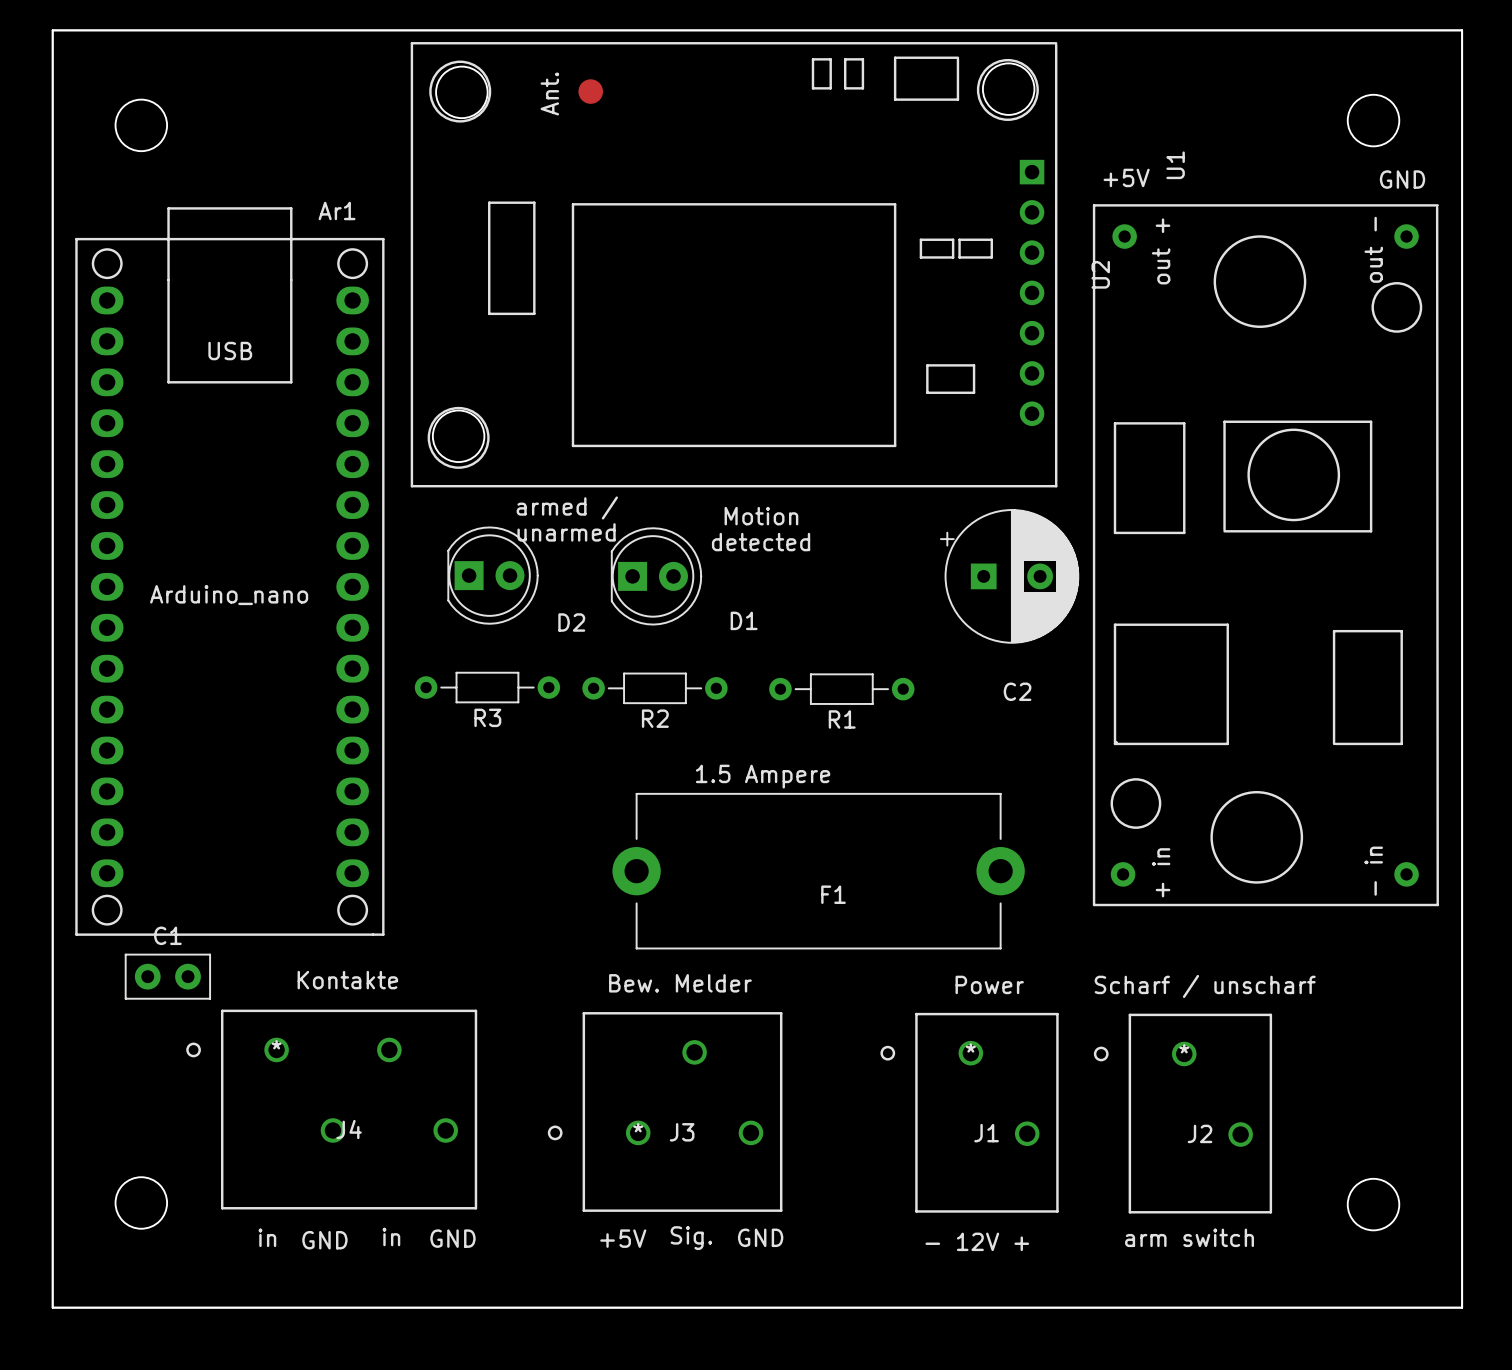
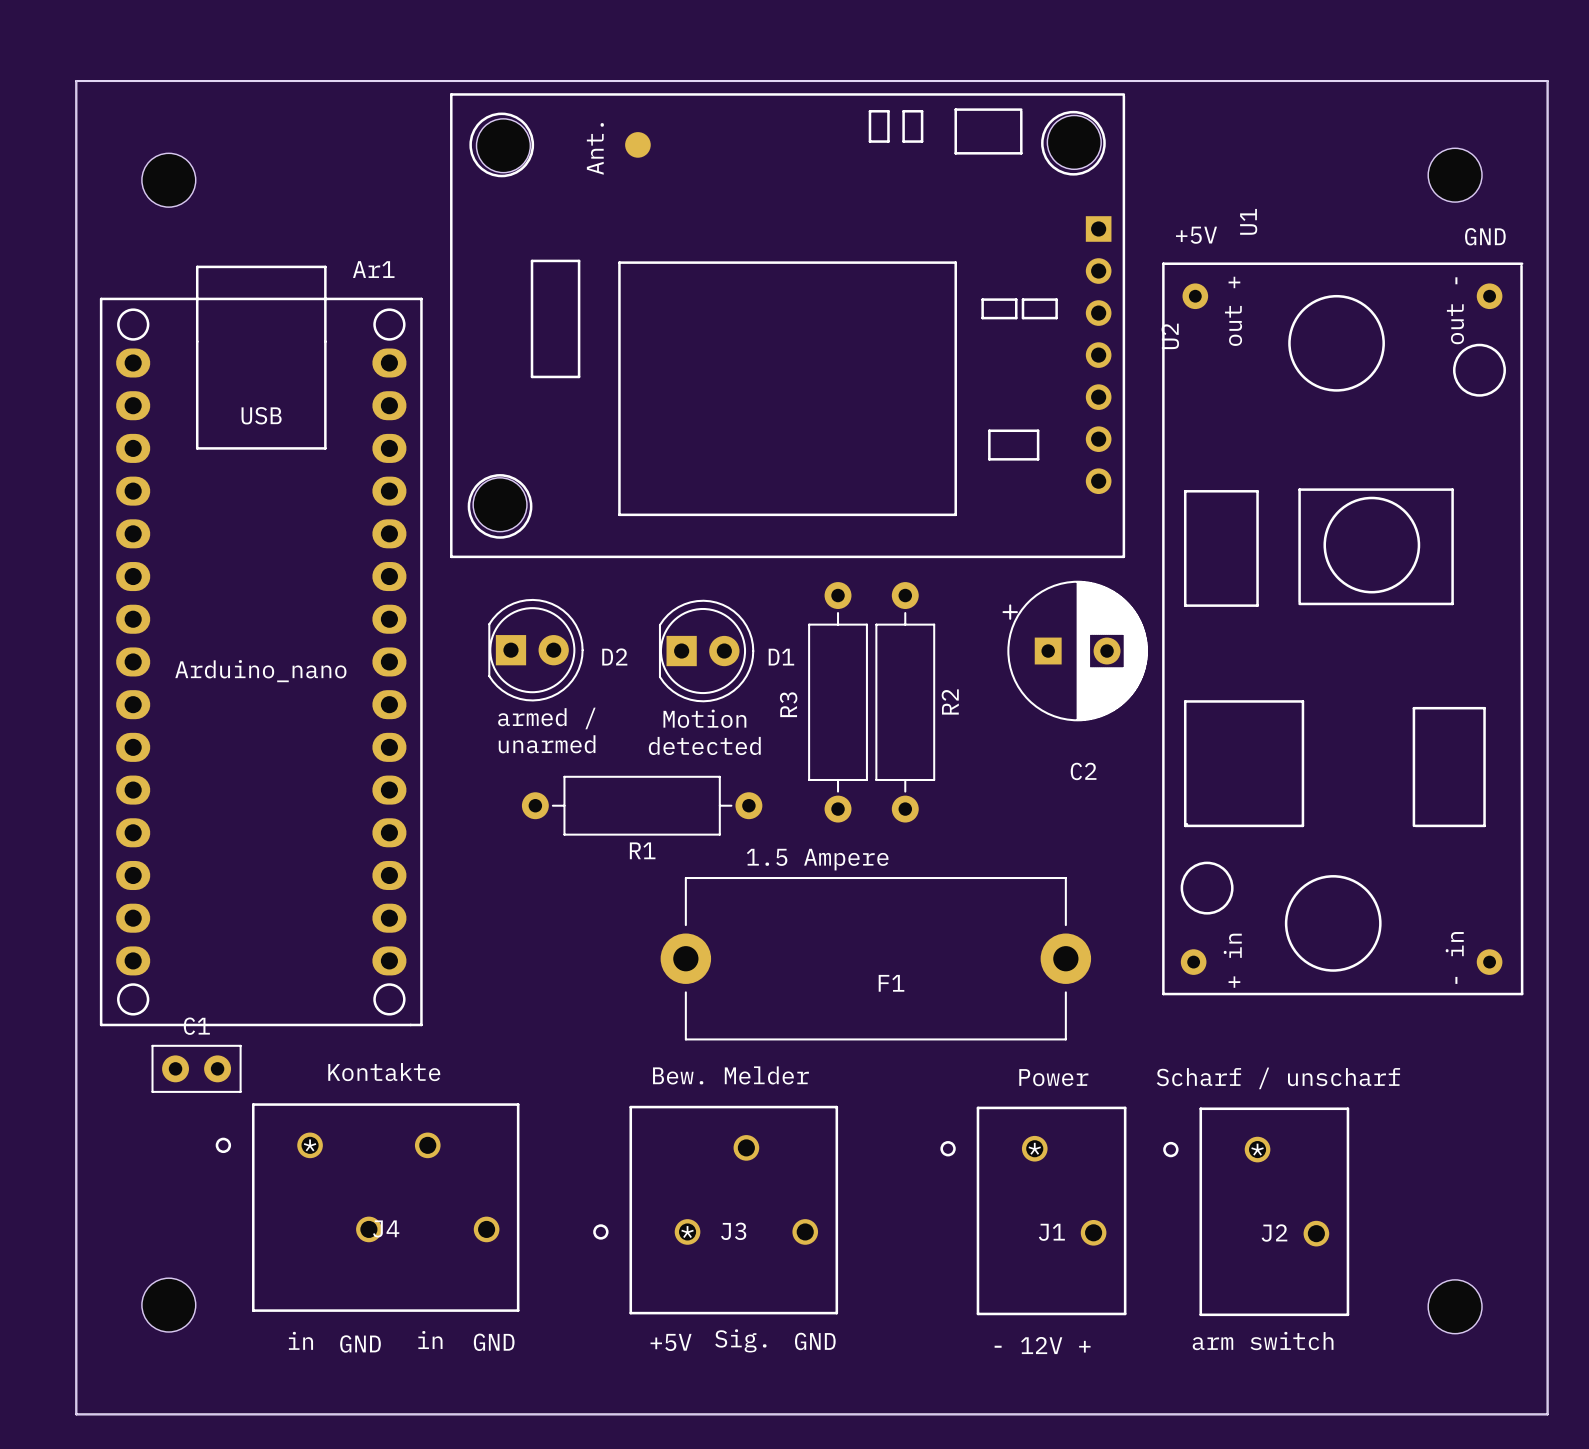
text position: armed / (567, 507) -> armed / (546, 718)
text position: Motion (761, 516) -> Motion (704, 718)
text position: unarmed (566, 532) -> unarmed (547, 744)
text position: detected (761, 542) -> detected (704, 745)
D1 name position: D1 (744, 620) -> D1 (781, 657)
D2 name position: D2 (571, 622) -> D2 (614, 656)
R3 footprint: [414, 671, 561, 704] -> [808, 582, 868, 823]
R2 footprint: [582, 672, 728, 705] -> [875, 582, 936, 823]
R1 footprint: [769, 673, 915, 705] -> [521, 775, 763, 836]
R3 name position: R3 (487, 717) -> R3 (788, 704)
R2 name position: R2 (655, 718) -> R2 (950, 701)

